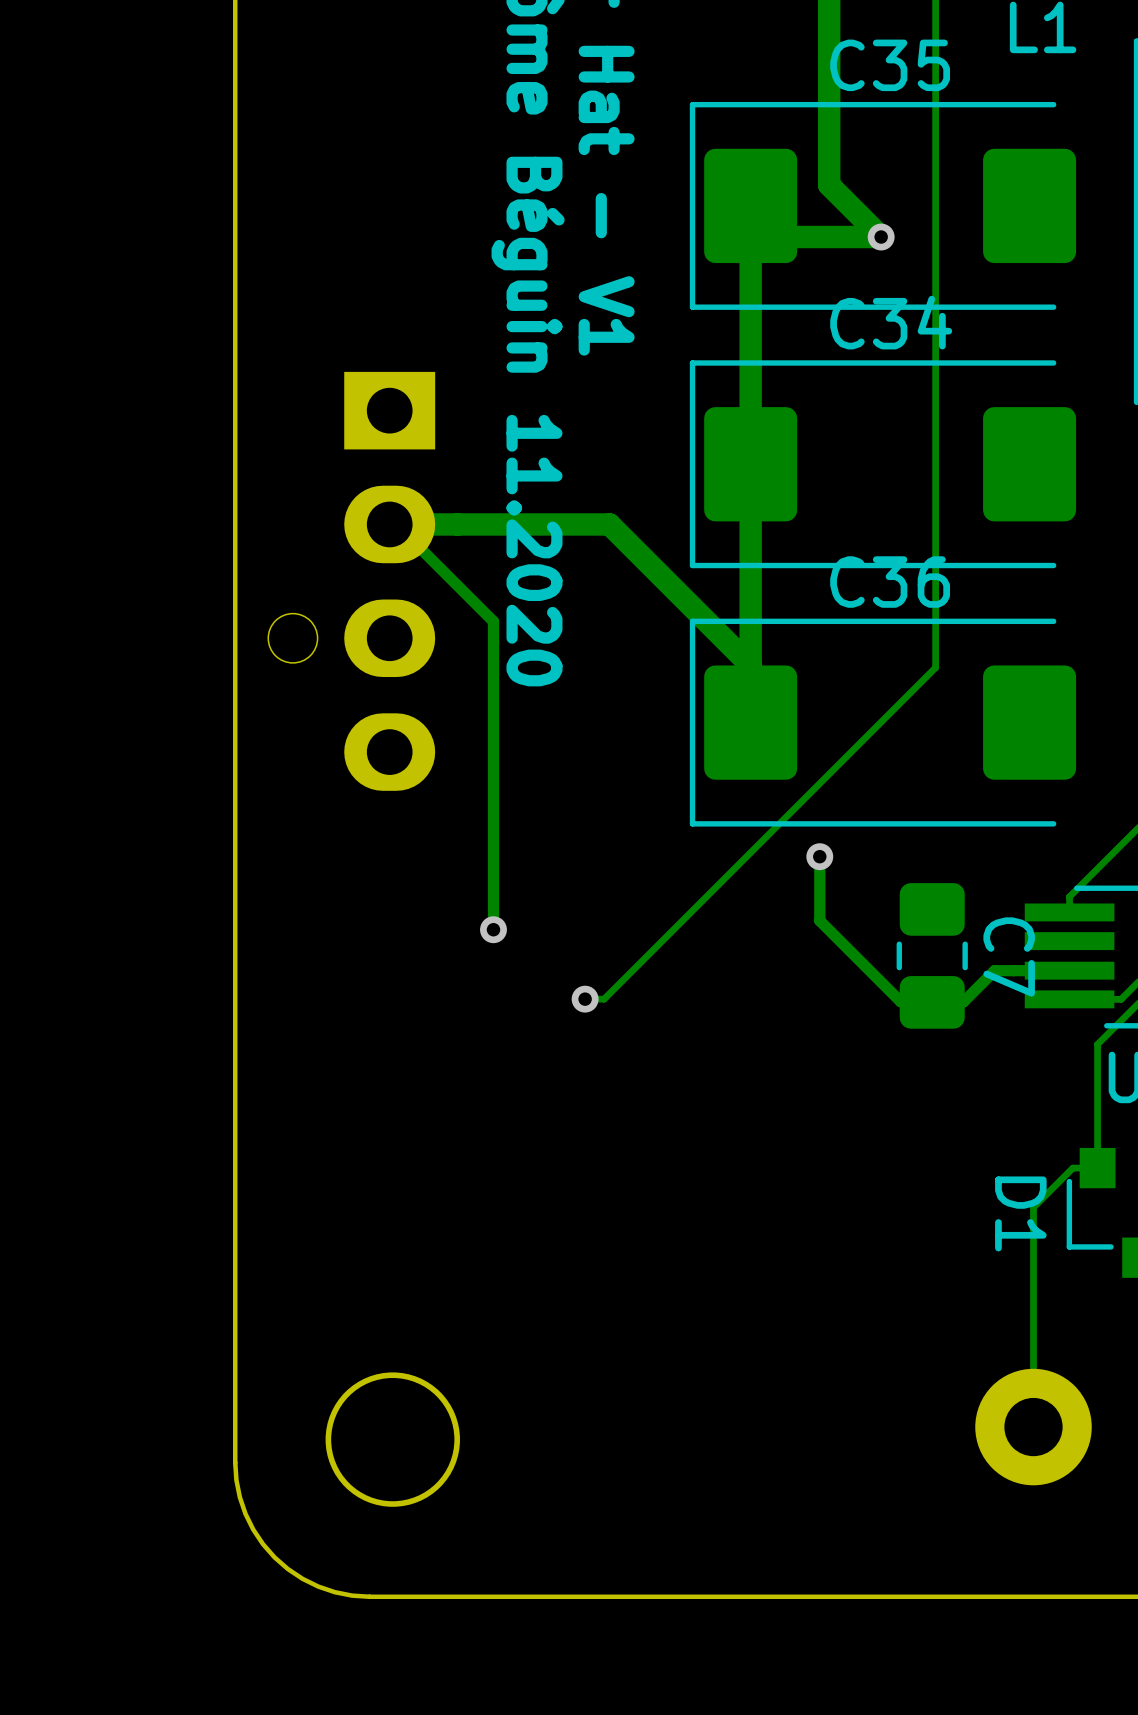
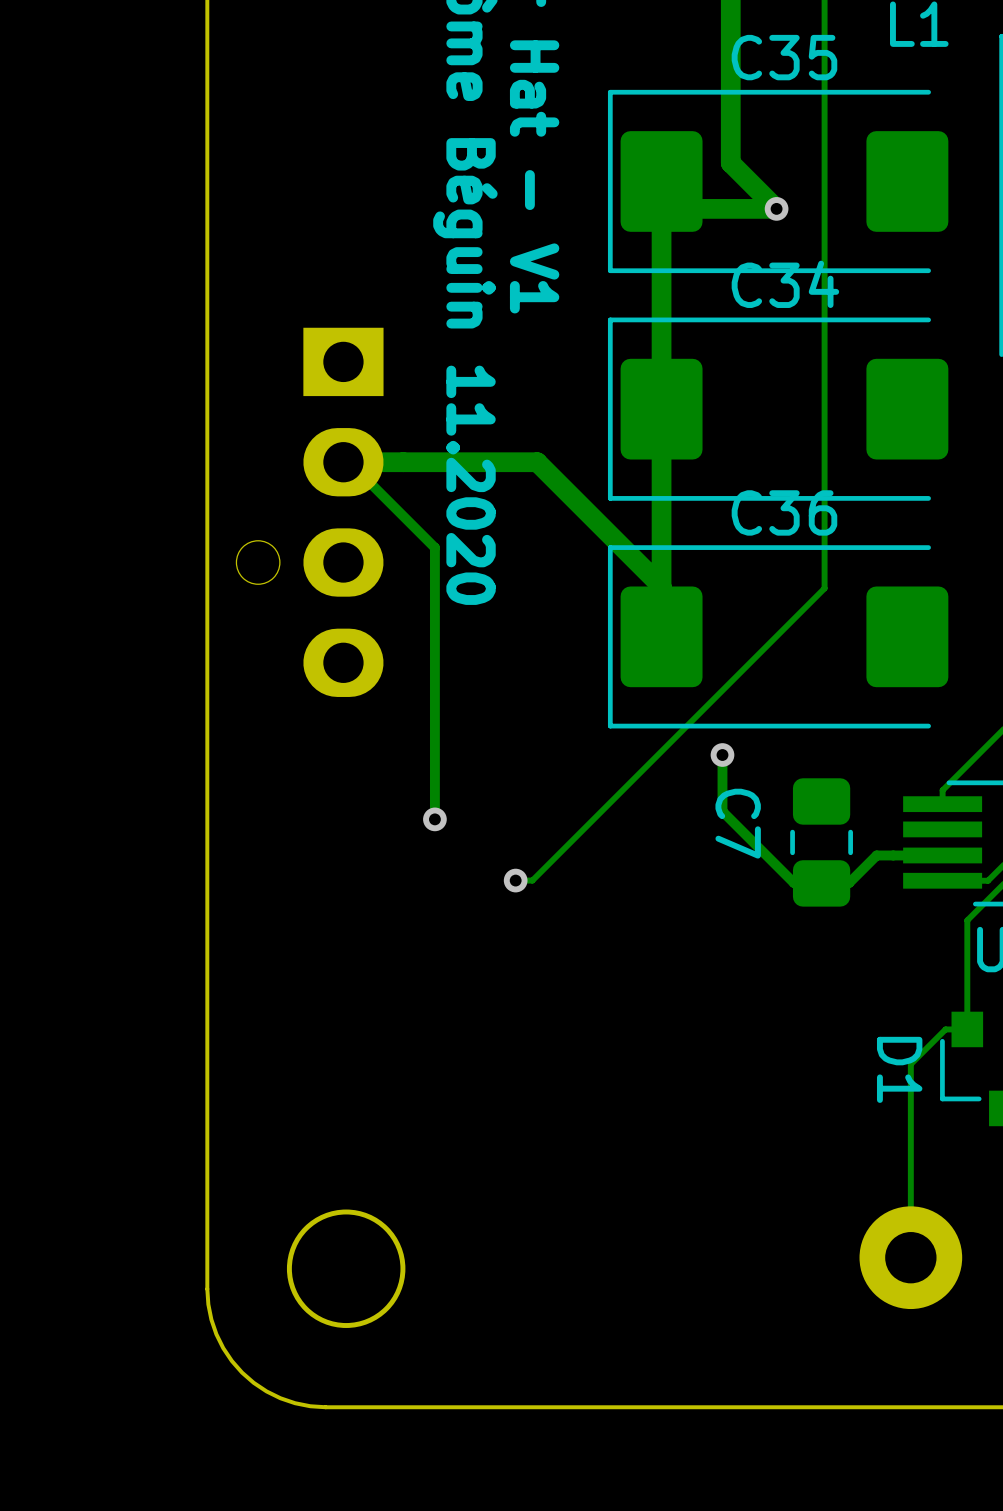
C7 name position: C7 (1009, 956) -> C7 (738, 823)

